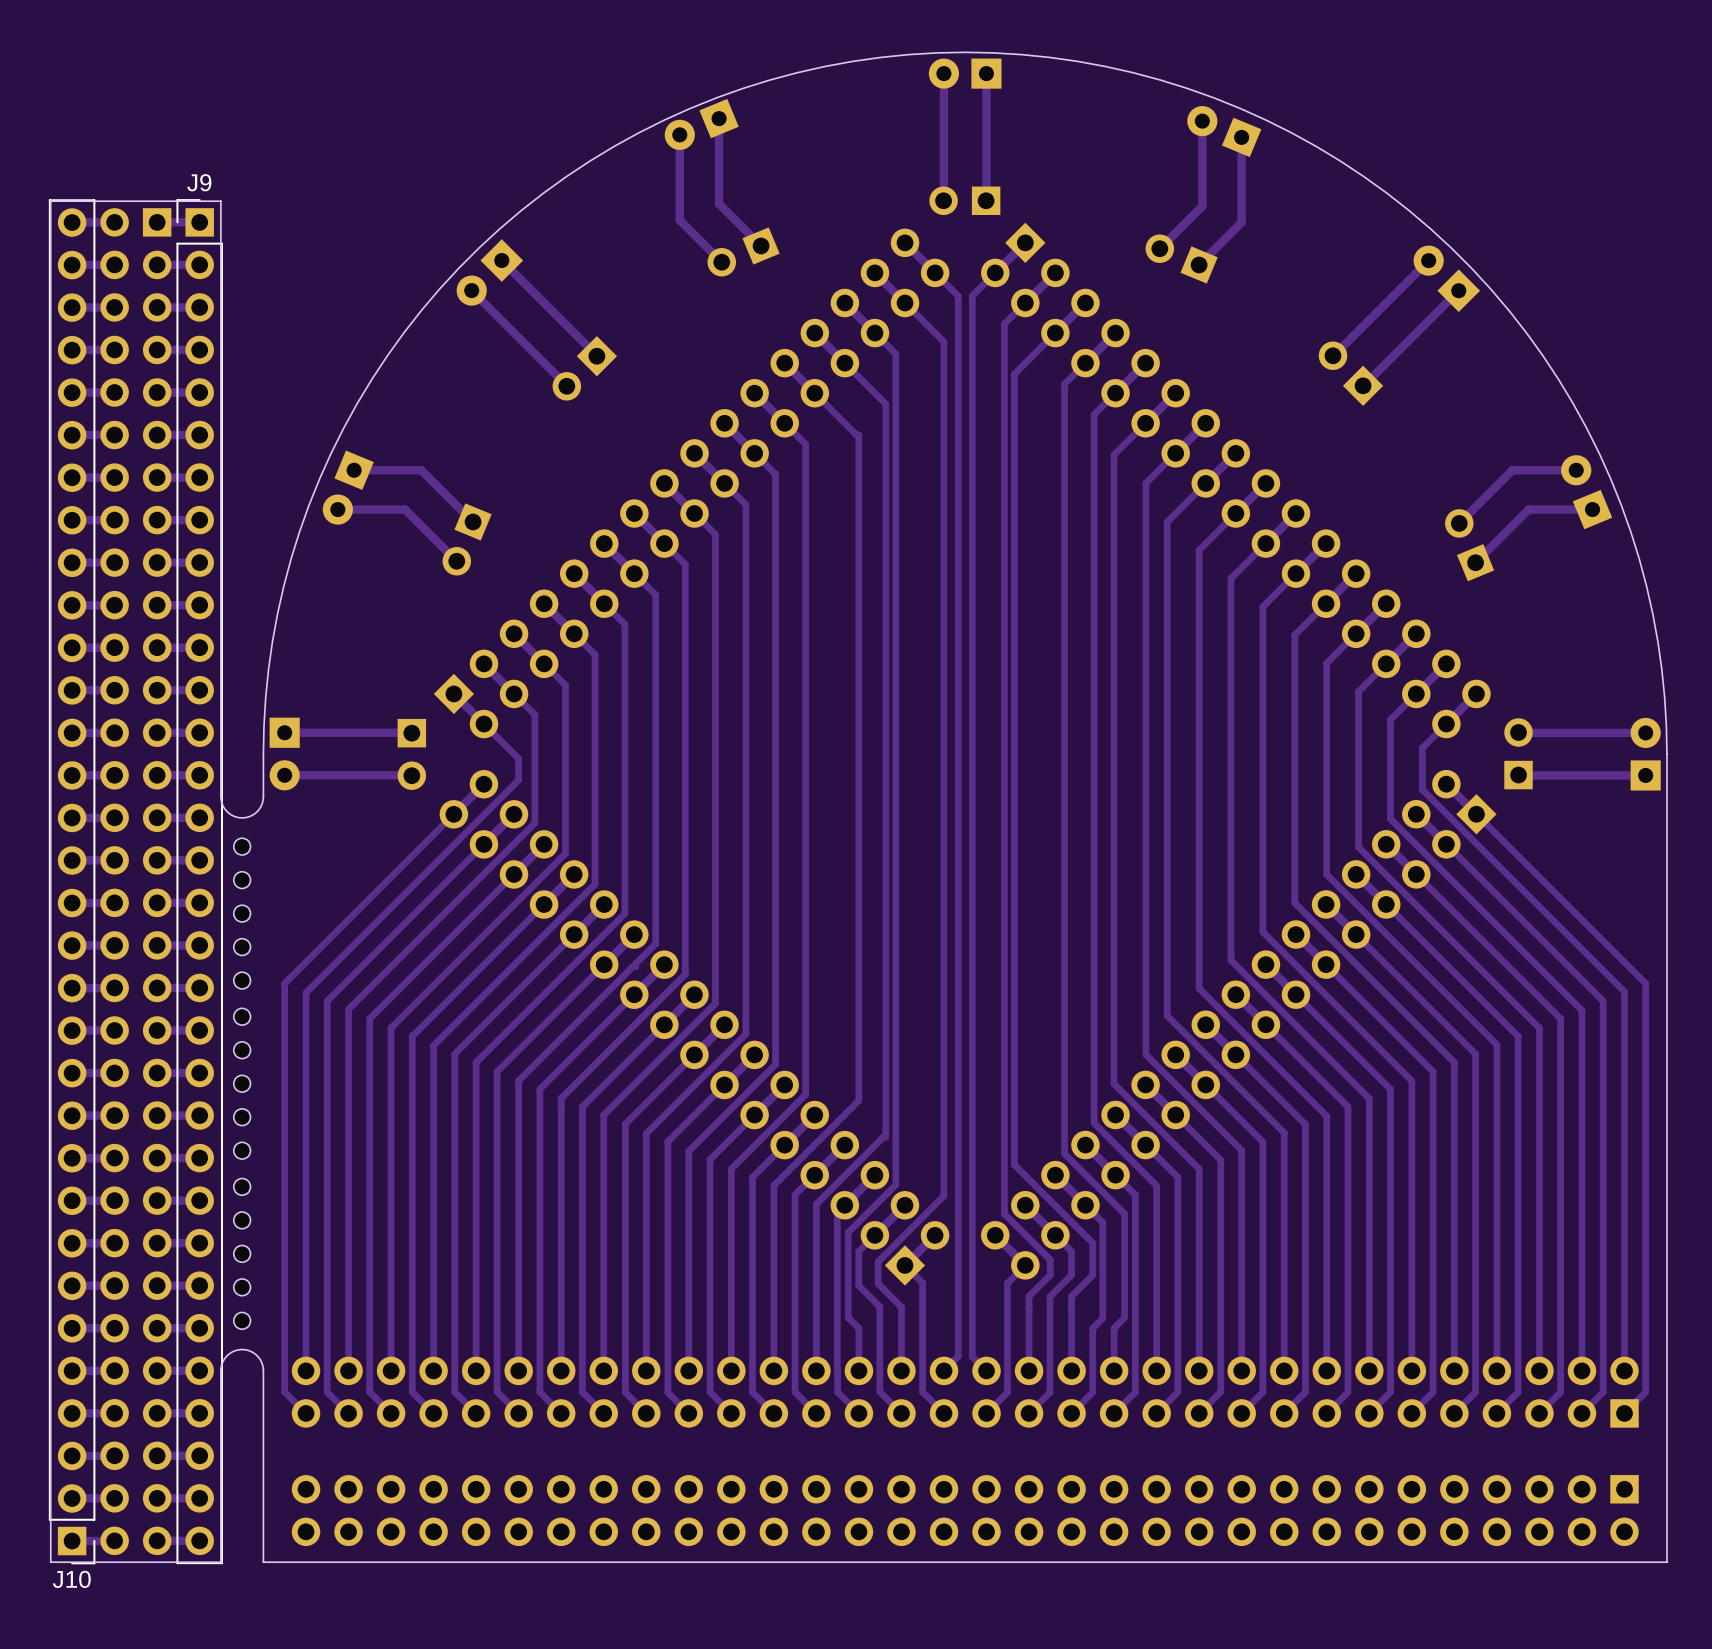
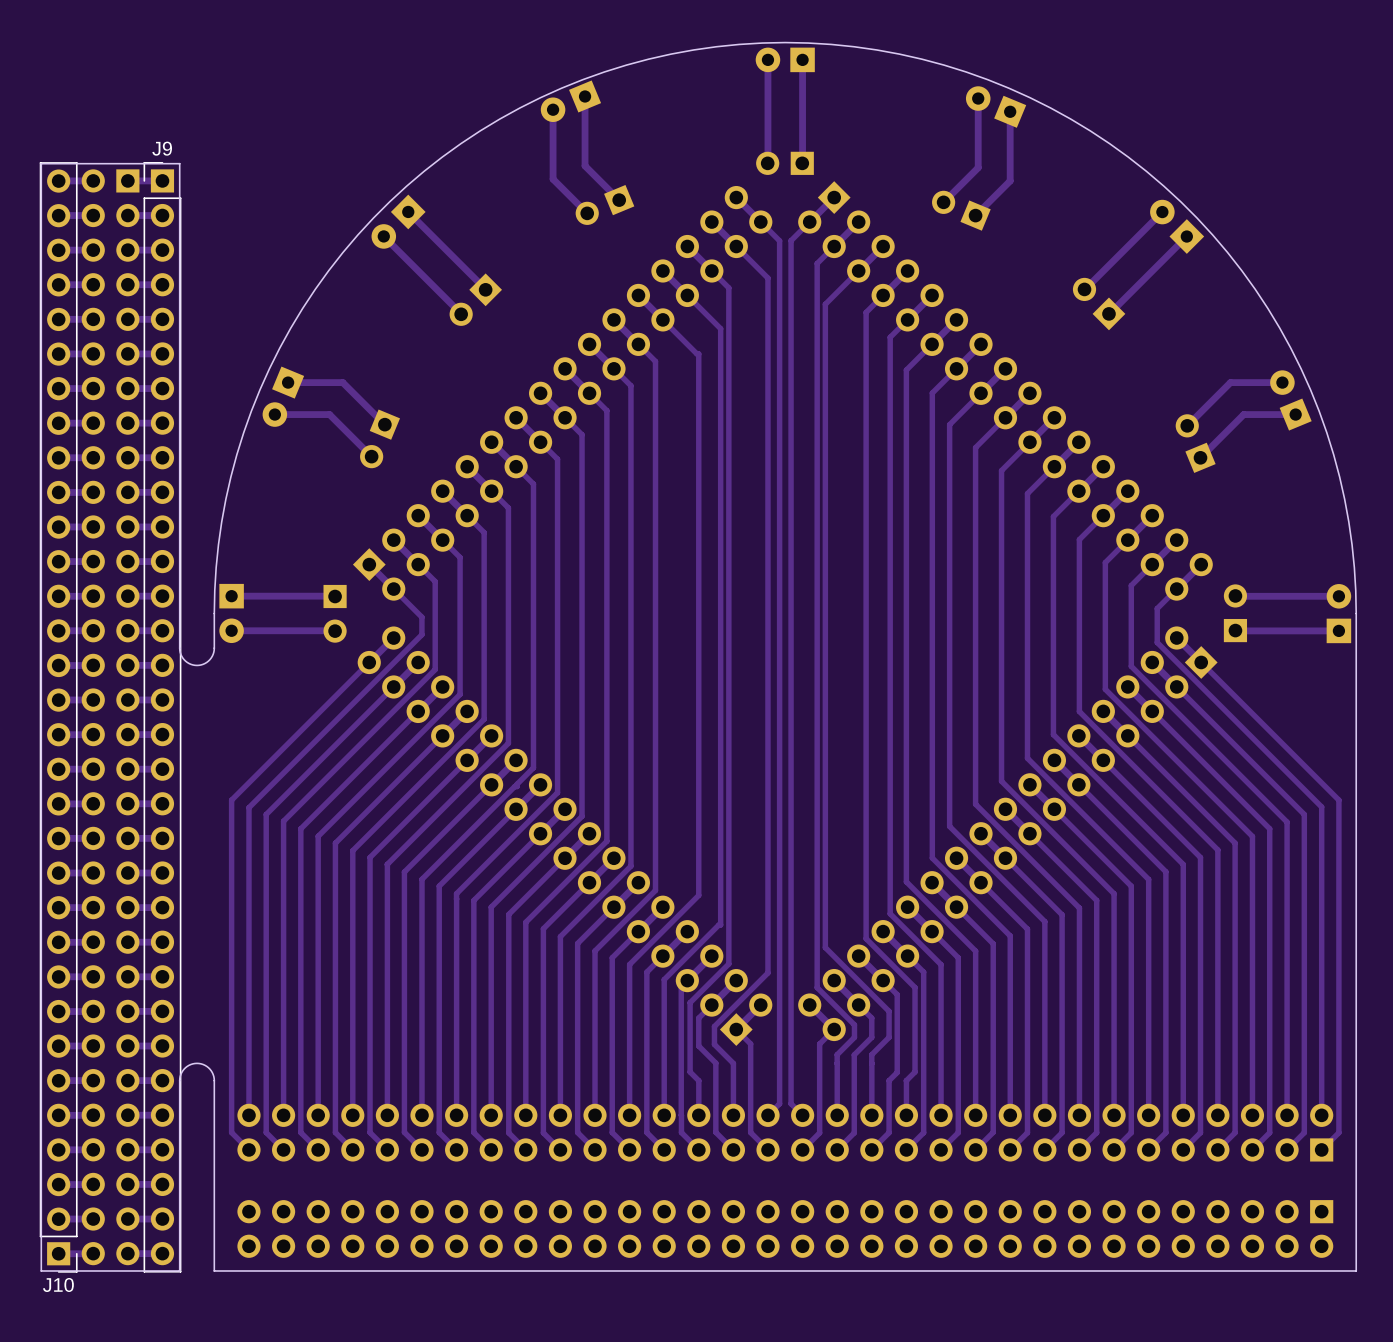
part: (242, 913) -> none
part: (242, 1083) -> none
part: (242, 1253) -> none
board edge: (263, 1370) (258, 1356) (252, 1351) (242, 1349) (232, 1351) (226, 1356) (220, 1370) -> (214, 1115) (213, 1074) (206, 1066) (197, 1063) (187, 1066) (180, 1074) (179, 1115)

